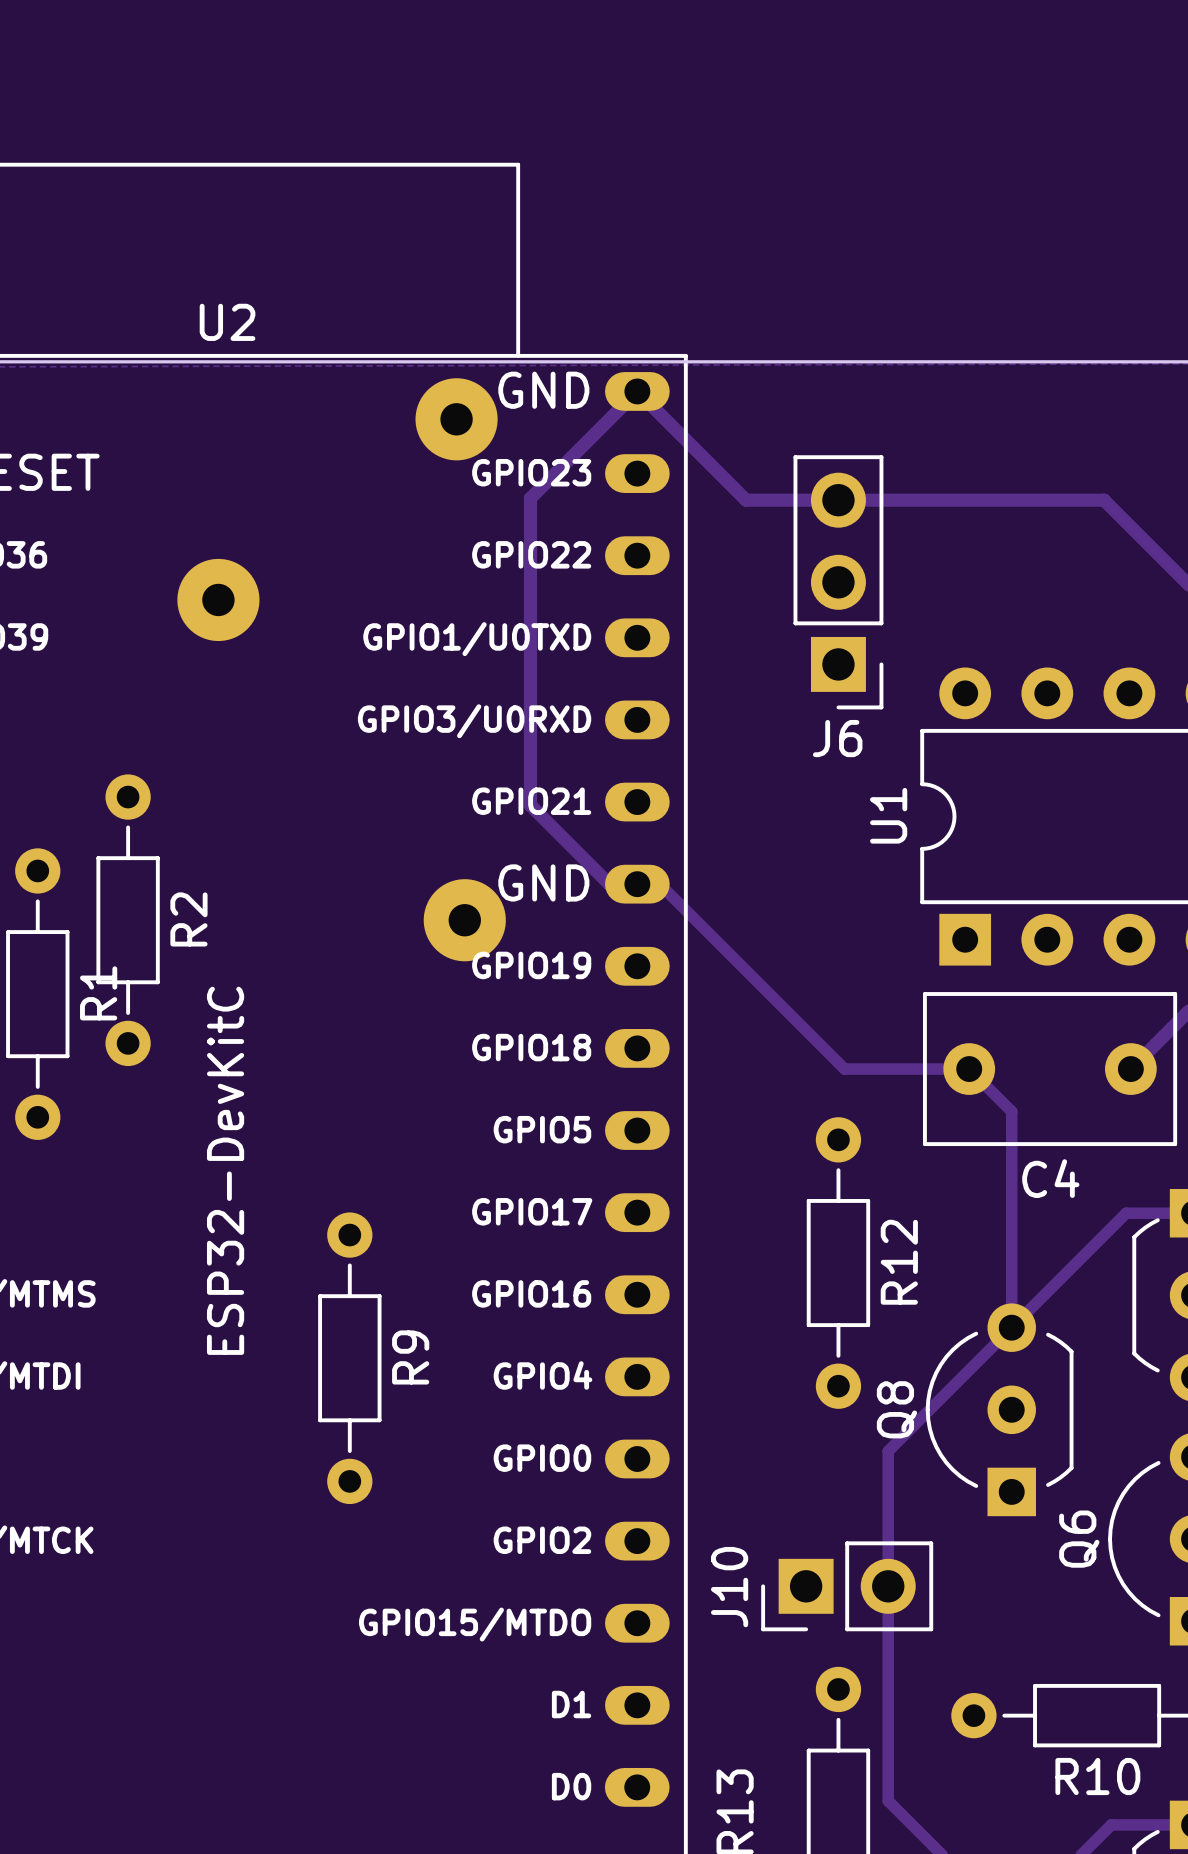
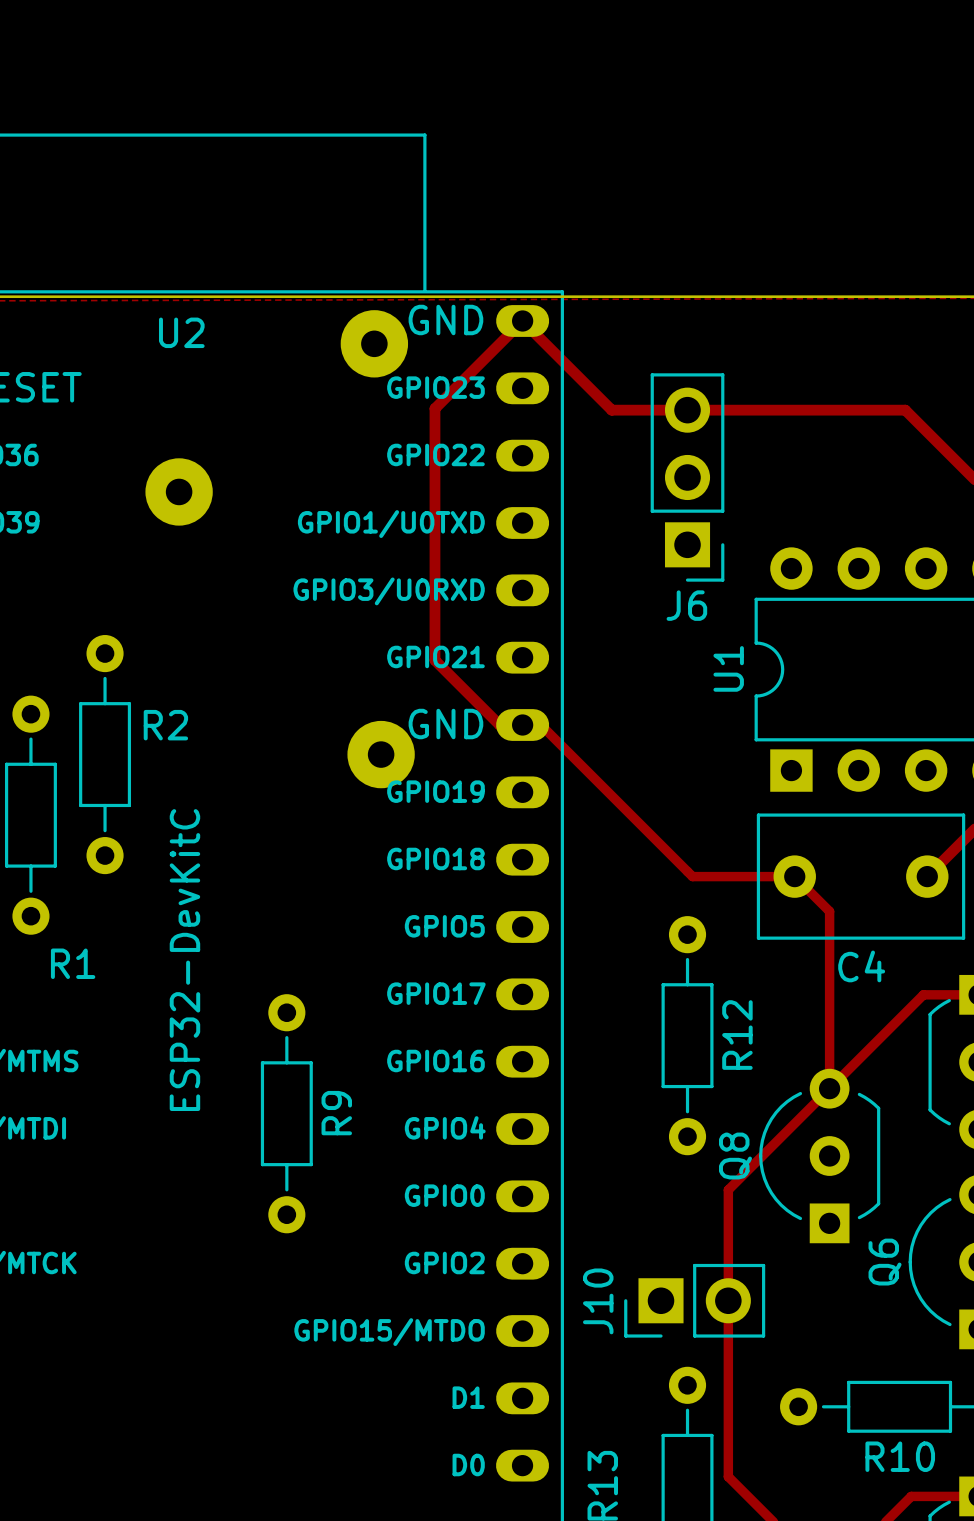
U2 name position: U2 (227, 322) -> U2 (181, 332)
R2 name rotation: 0° (188, 919) -> 90° clockwise (165, 725)
R1 name rotation: 0° (98, 993) -> 90° clockwise (73, 963)
R1 name position: R1 (98, 993) -> R1 (73, 963)

